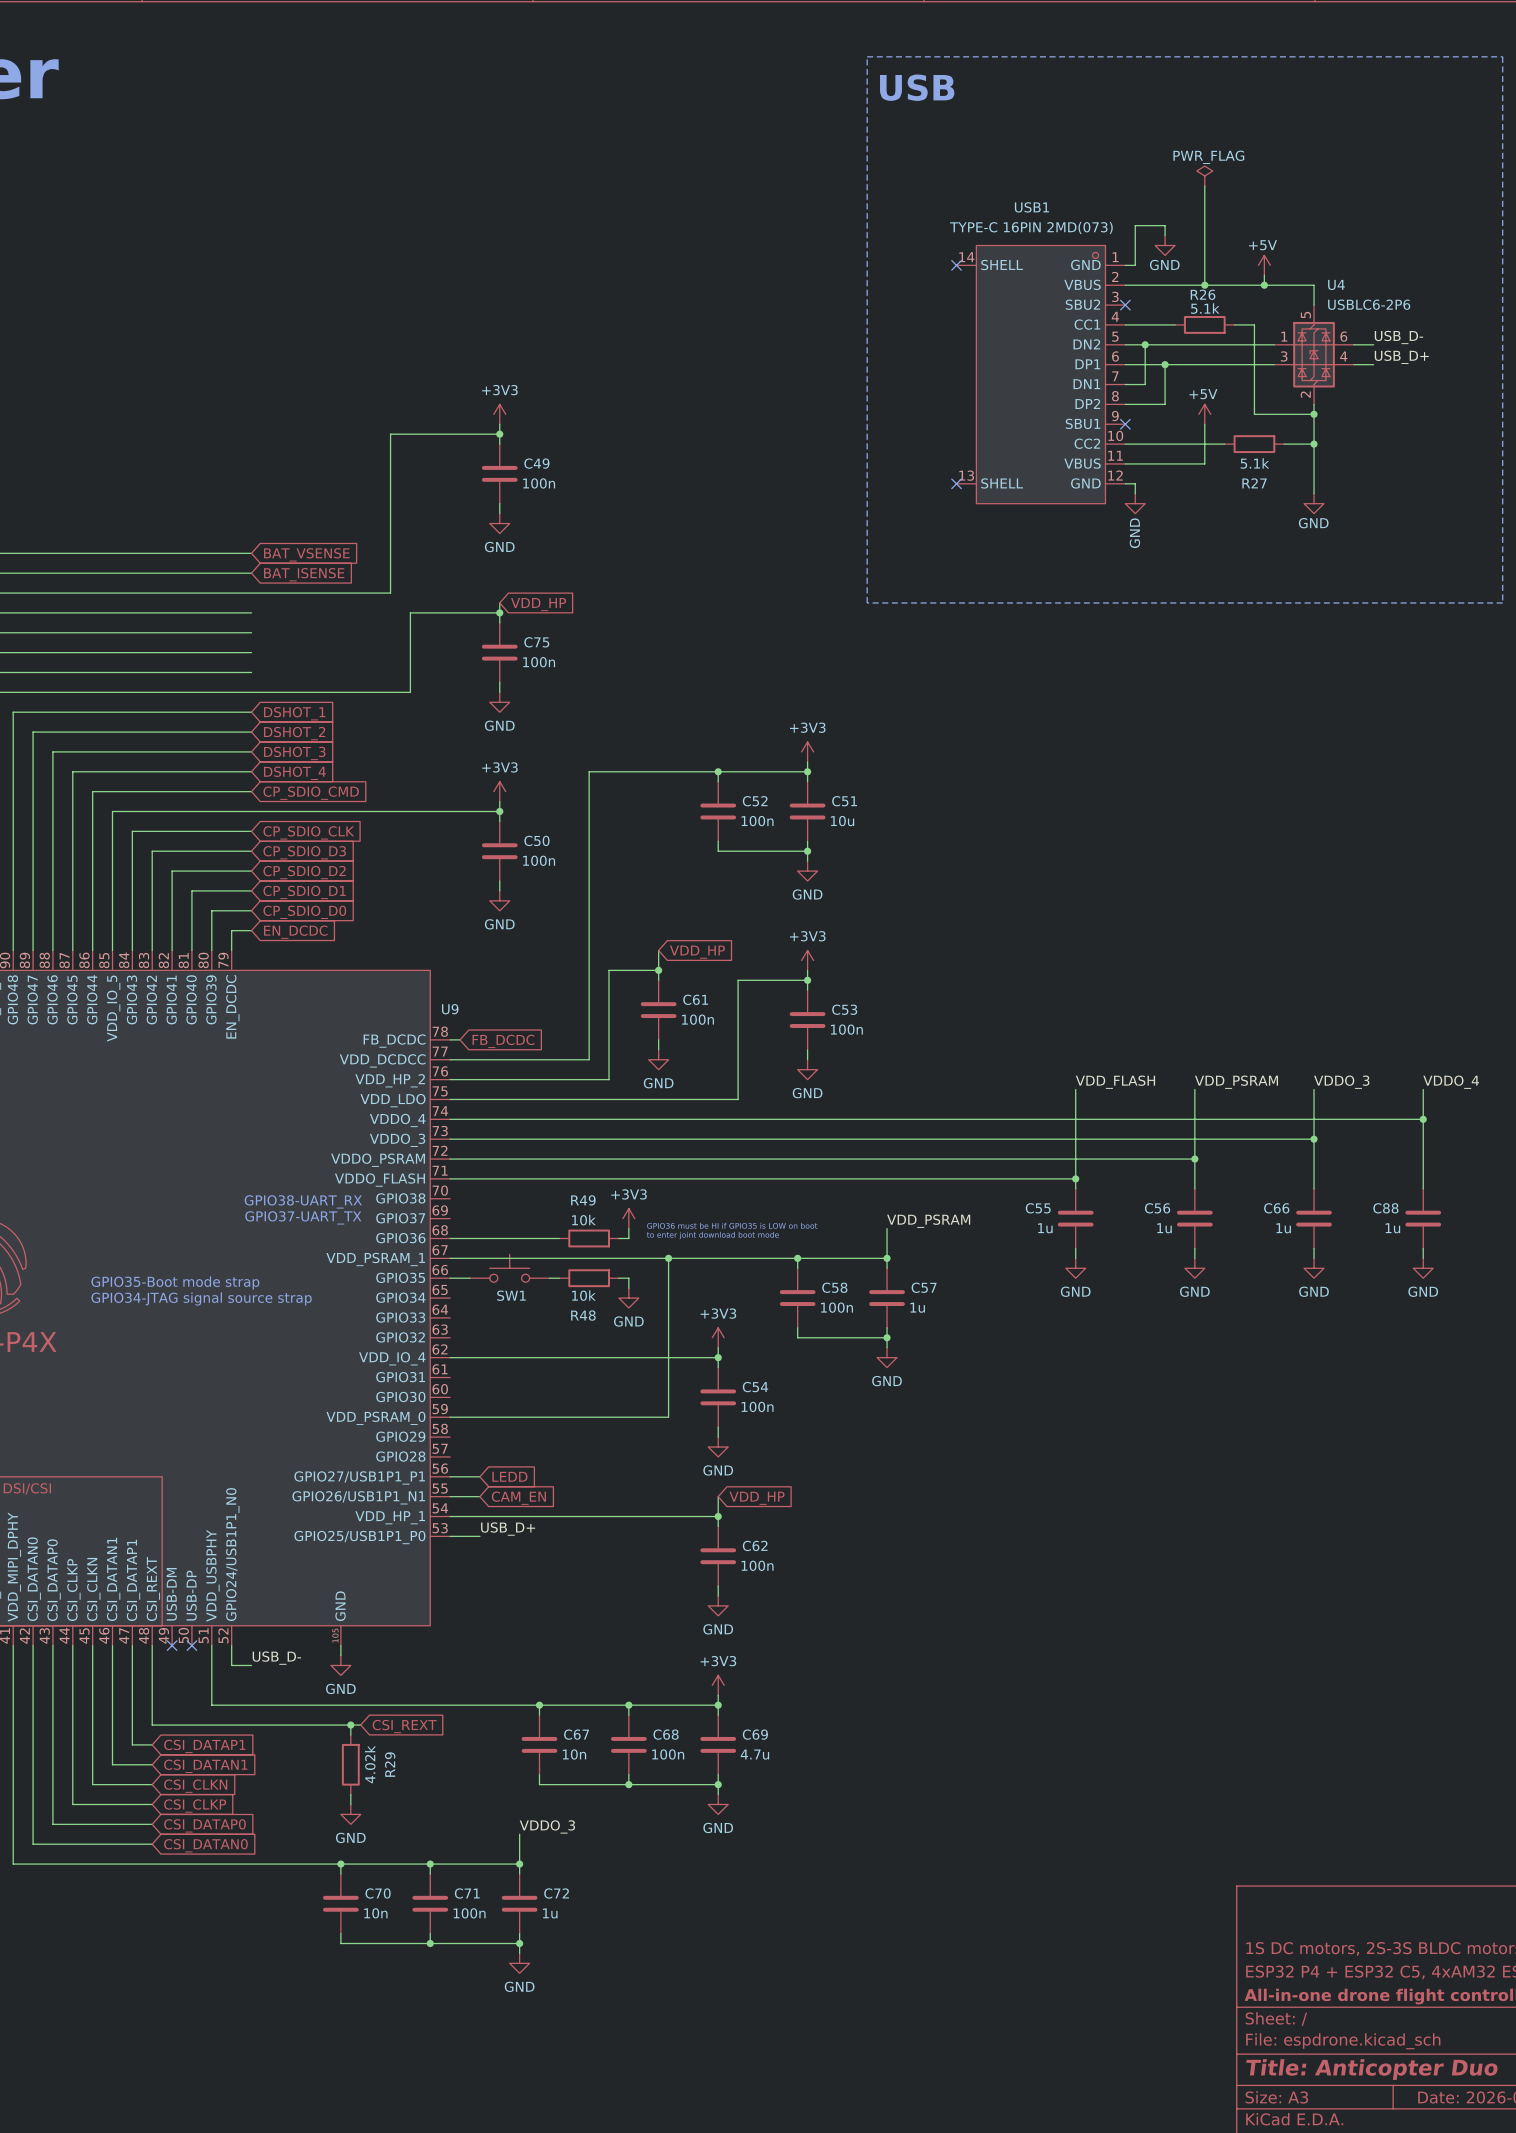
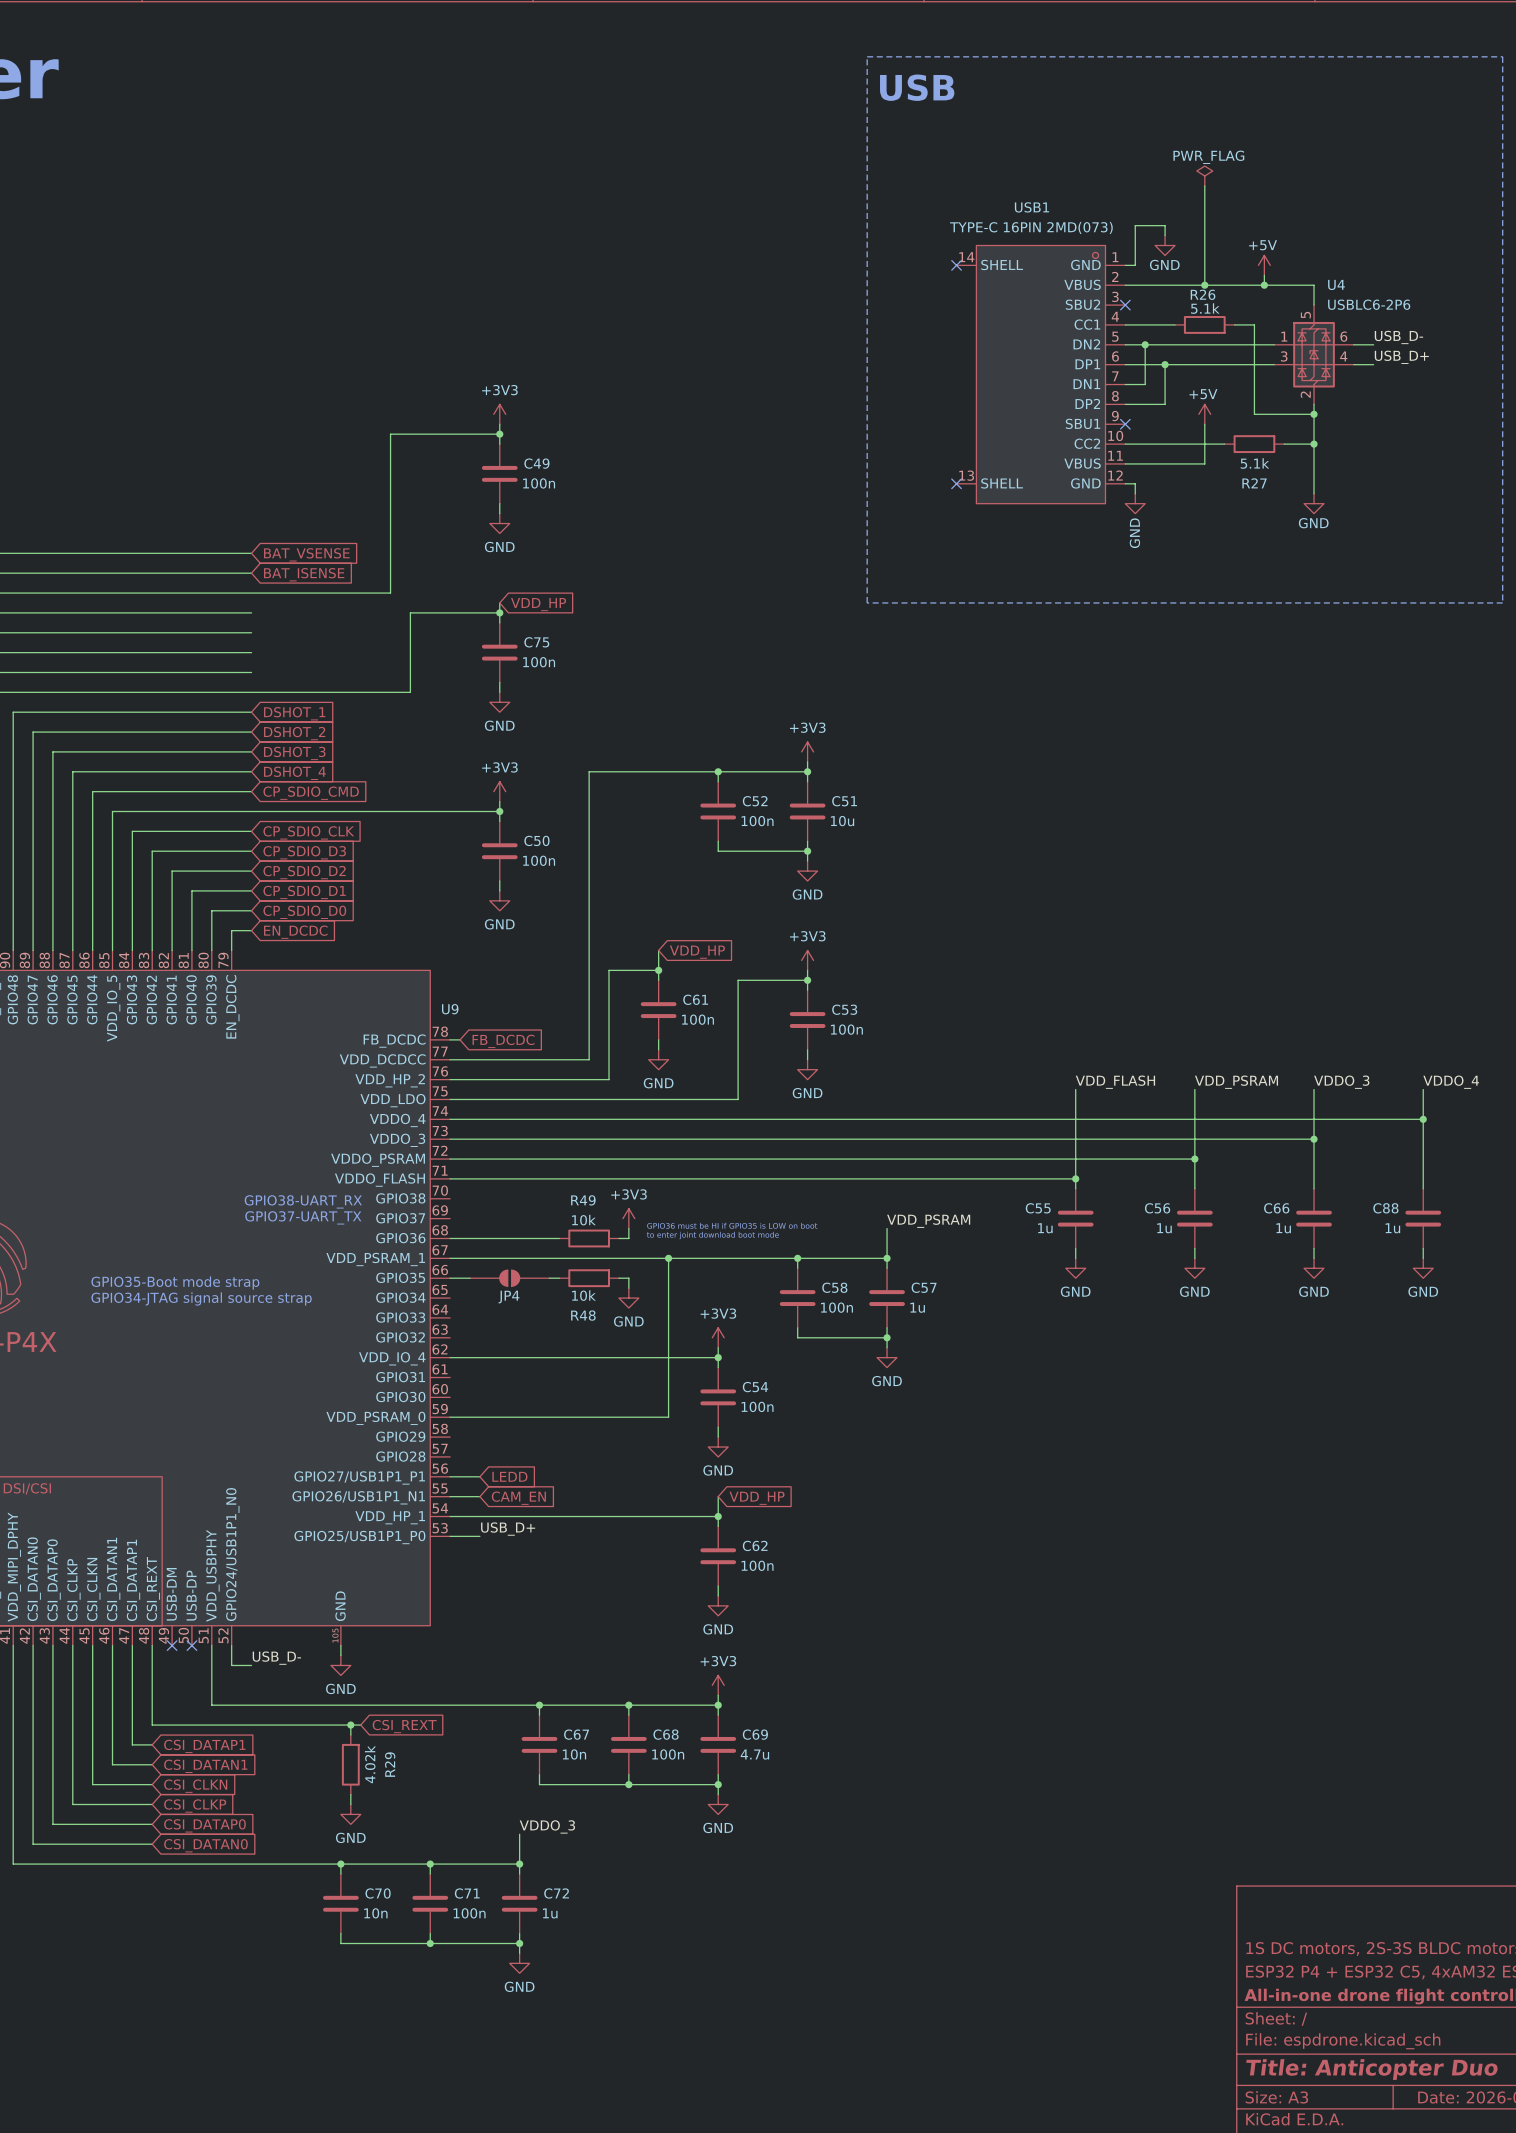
SW1: (509, 1268) -> none
JP4: none -> (509, 1278)

